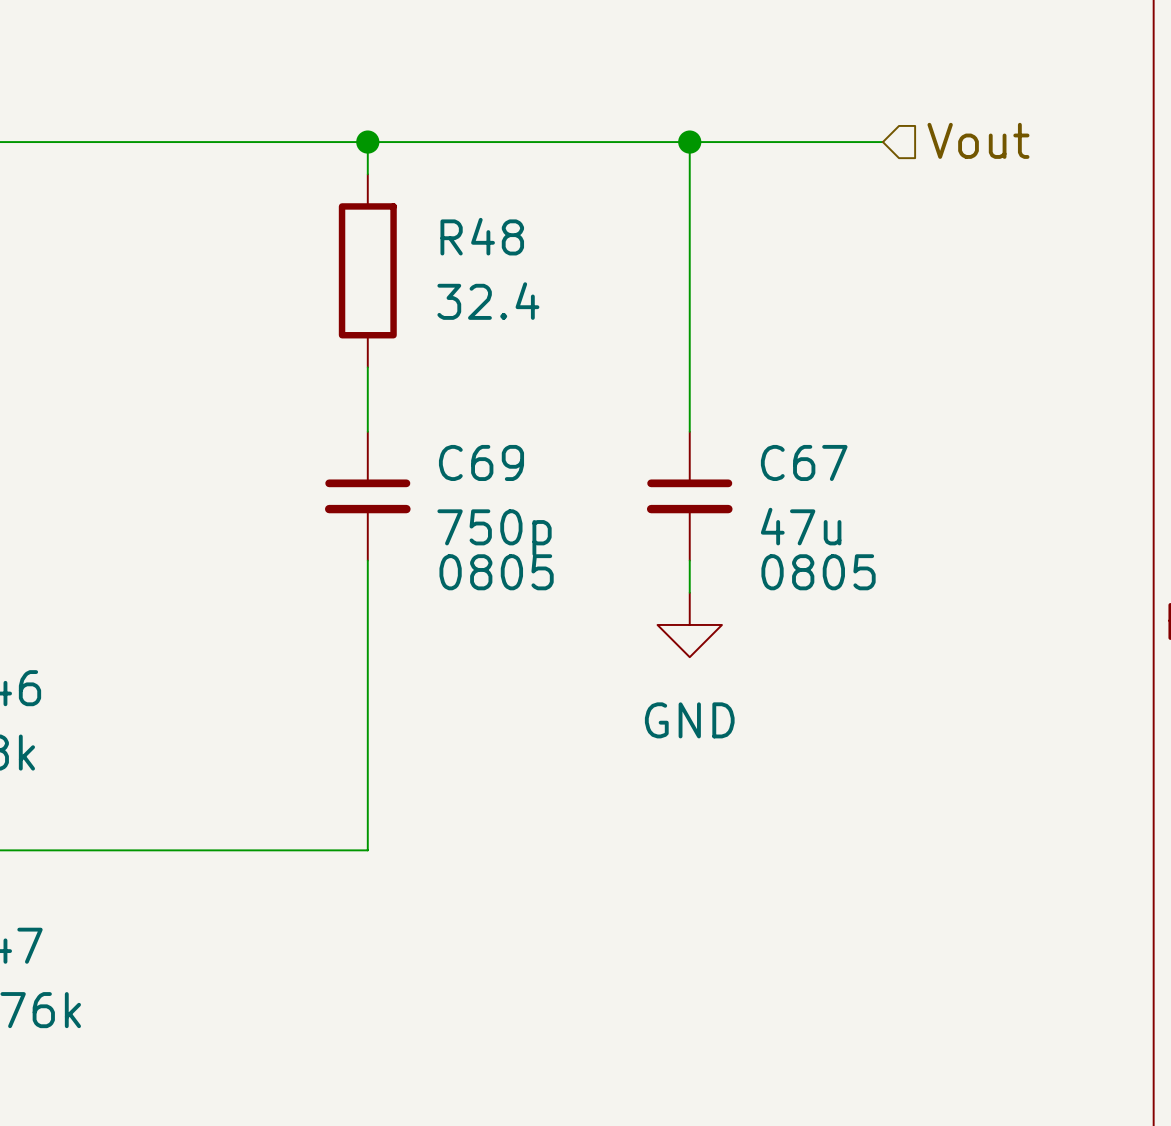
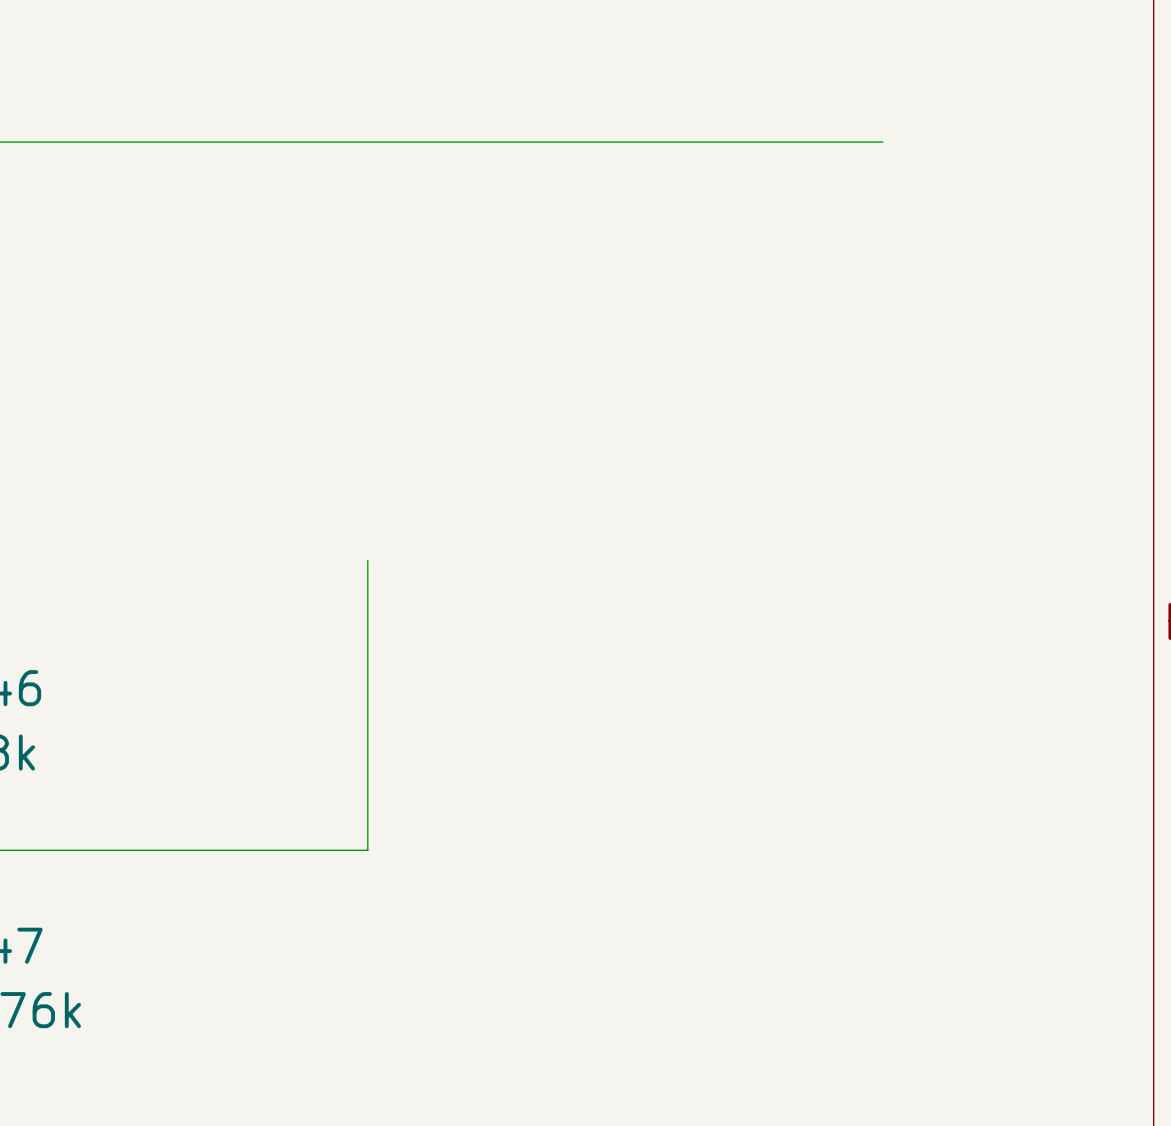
hierarchical label: Vout (978, 140) -> none
wire: (367, 142) (367, 174) -> none
junction: (367, 142) -> none
wire: (689, 142) (689, 431) -> none
junction: (689, 142) -> none
R48: (367, 270) -> none
wire: (367, 367) (367, 431) -> none
C69: 750p (367, 496) -> none
C67: 47u (689, 496) -> none
wire: (689, 560) (689, 592) -> none
power symbol: GND (689, 624) -> none

